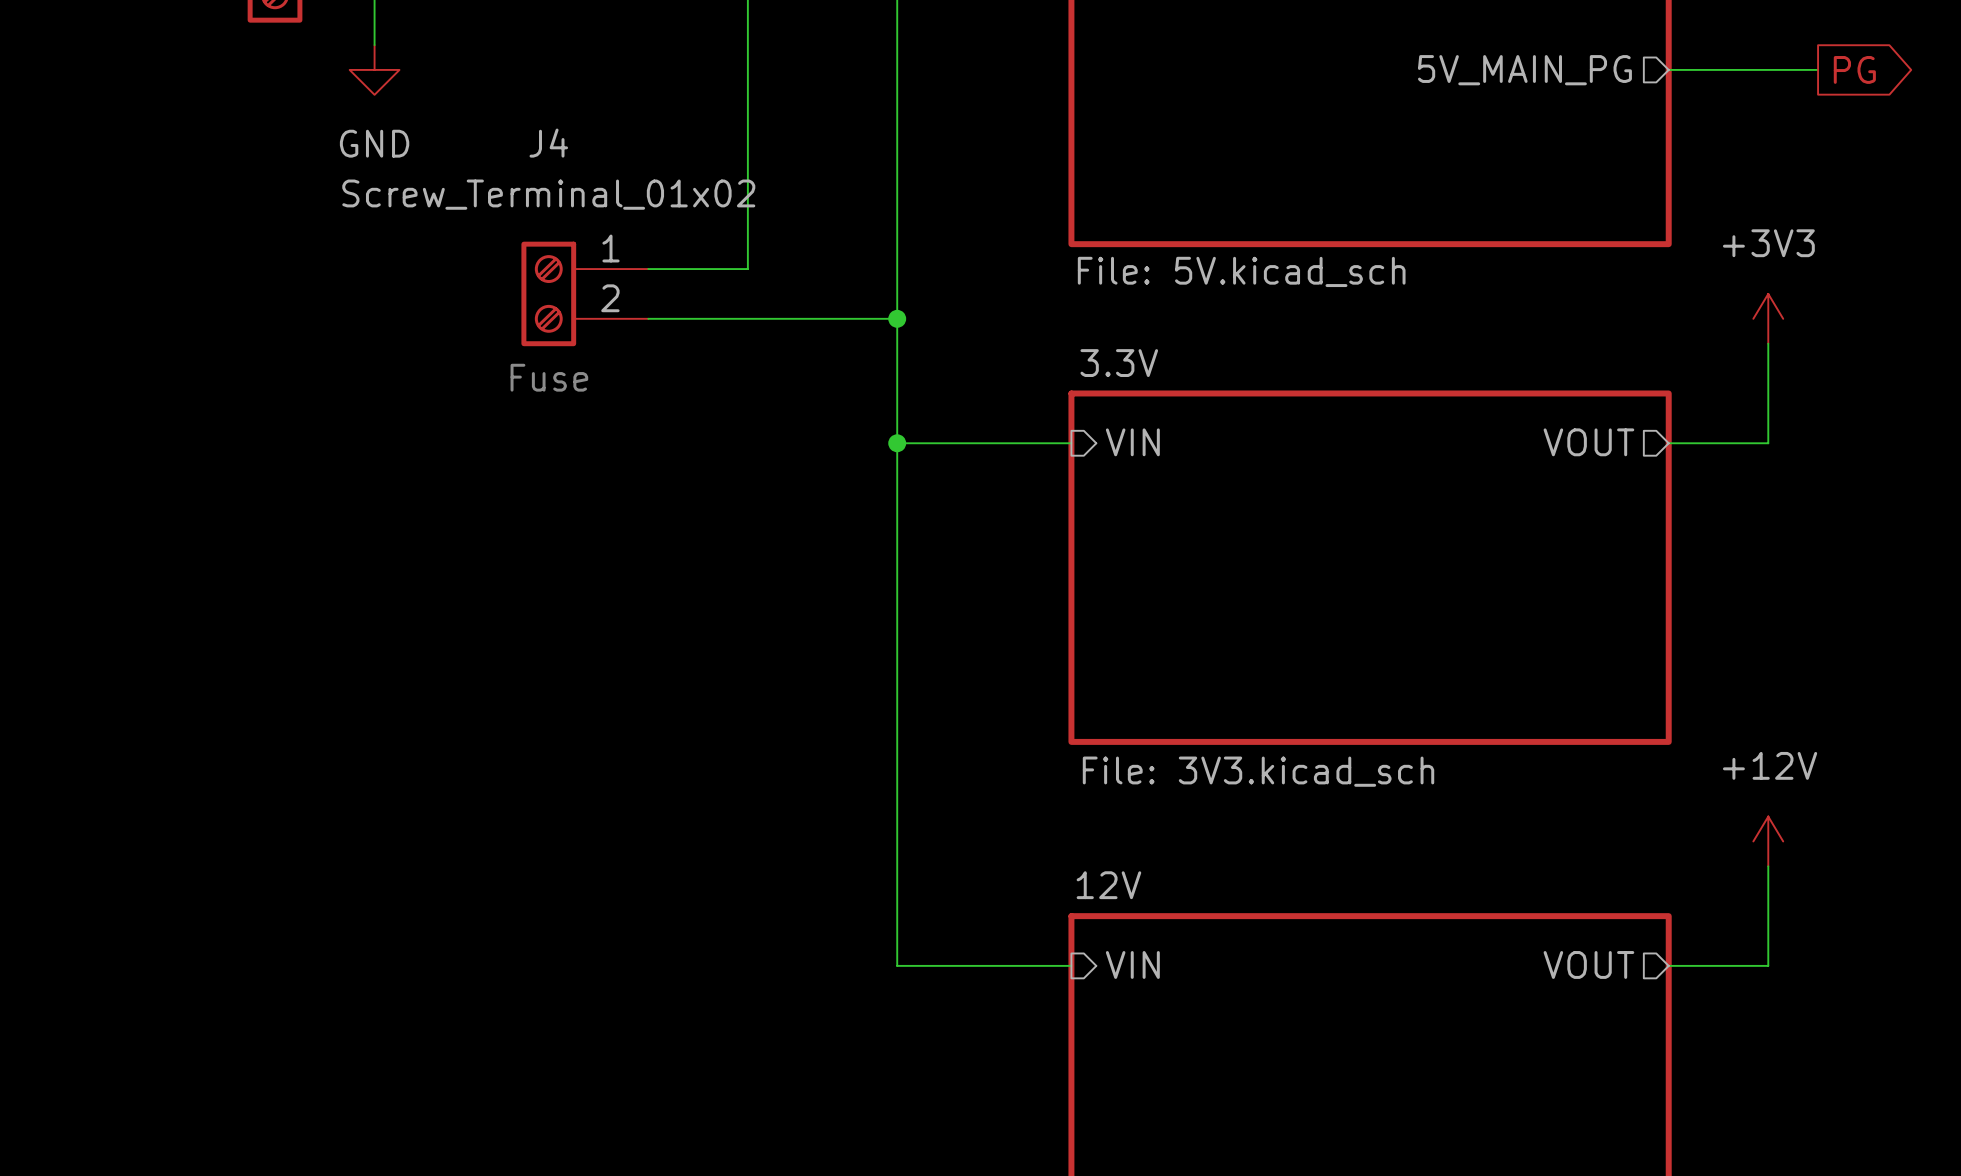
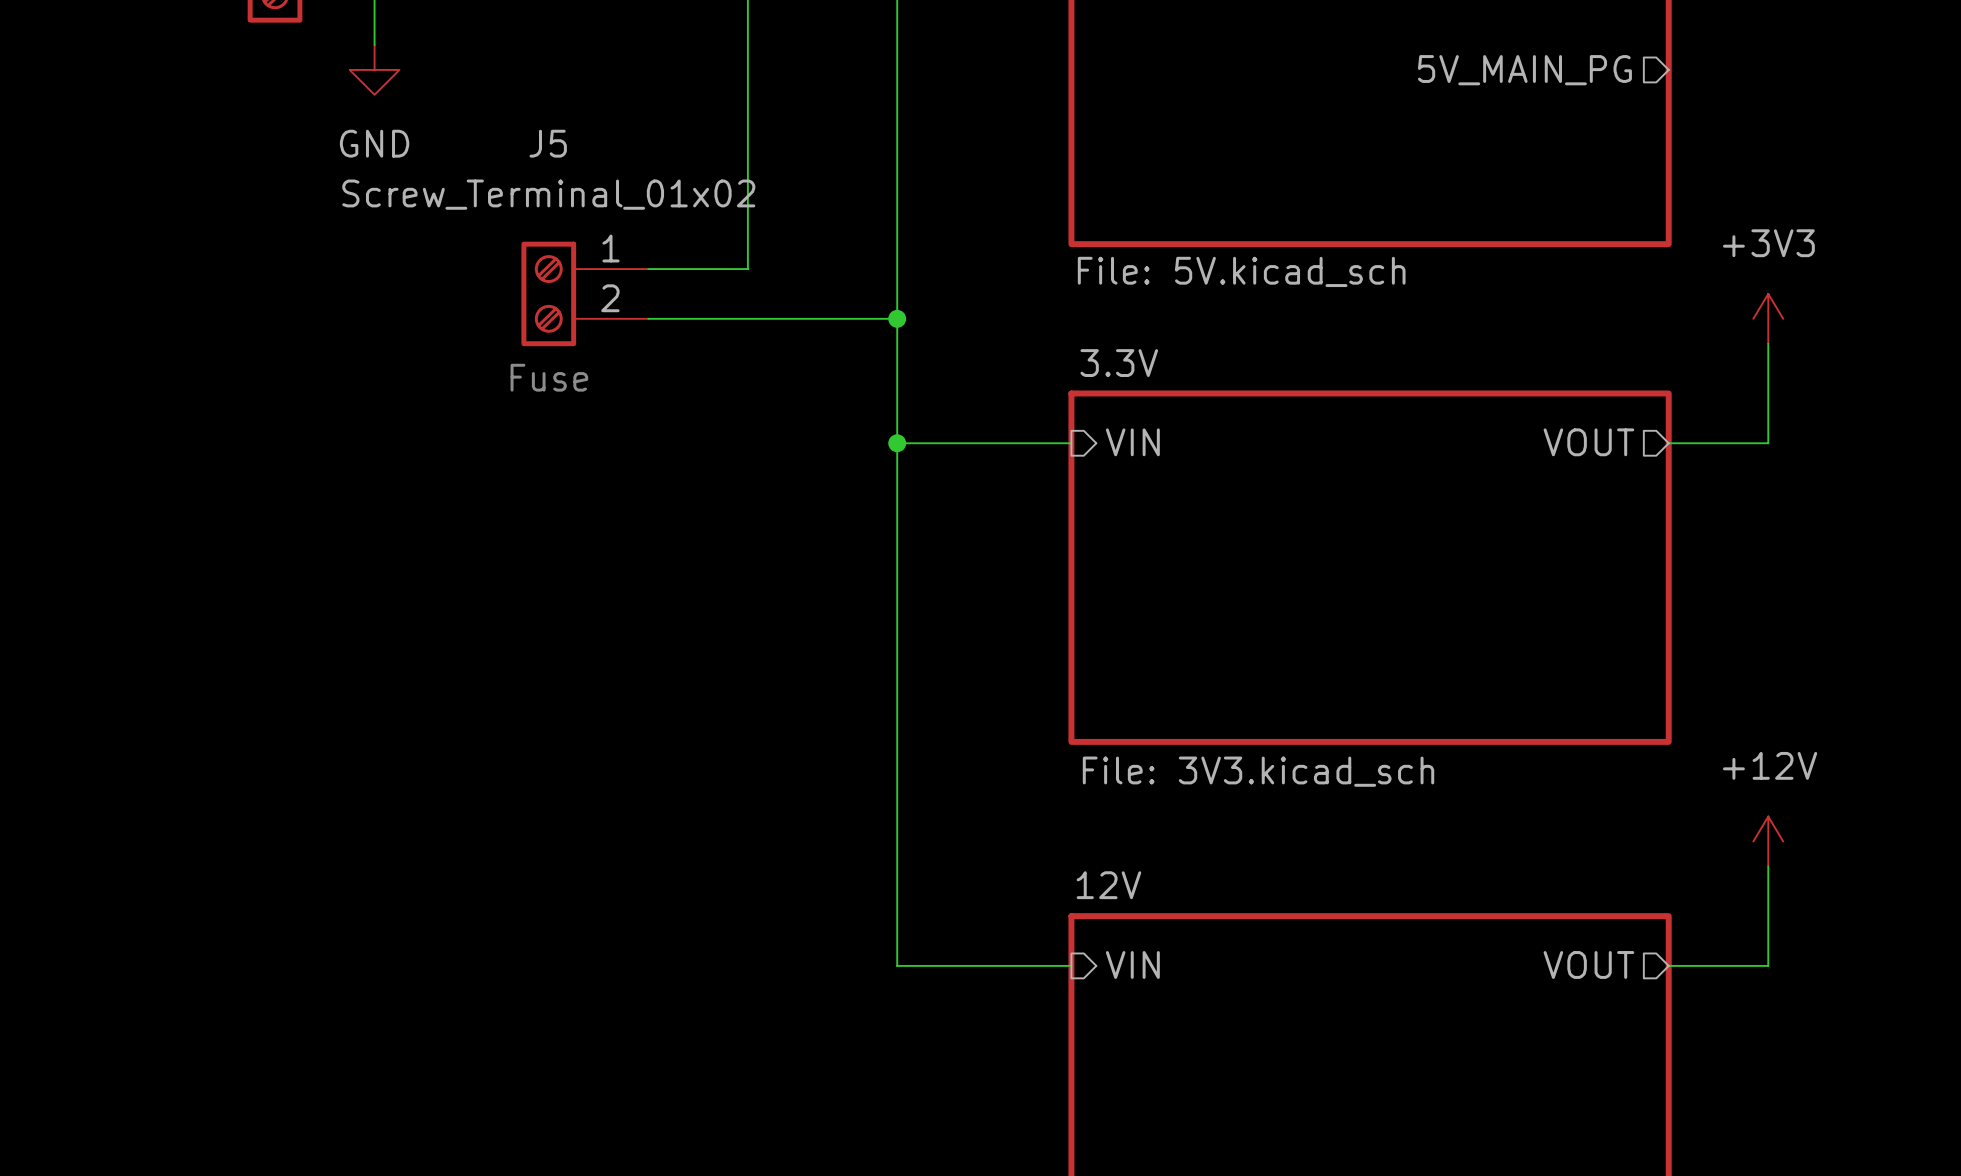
wire: (1668, 69) (1818, 69) -> none
global label: PG (1854, 69) -> none
J4 name: J4 (548, 143) -> J5 (548, 143)

